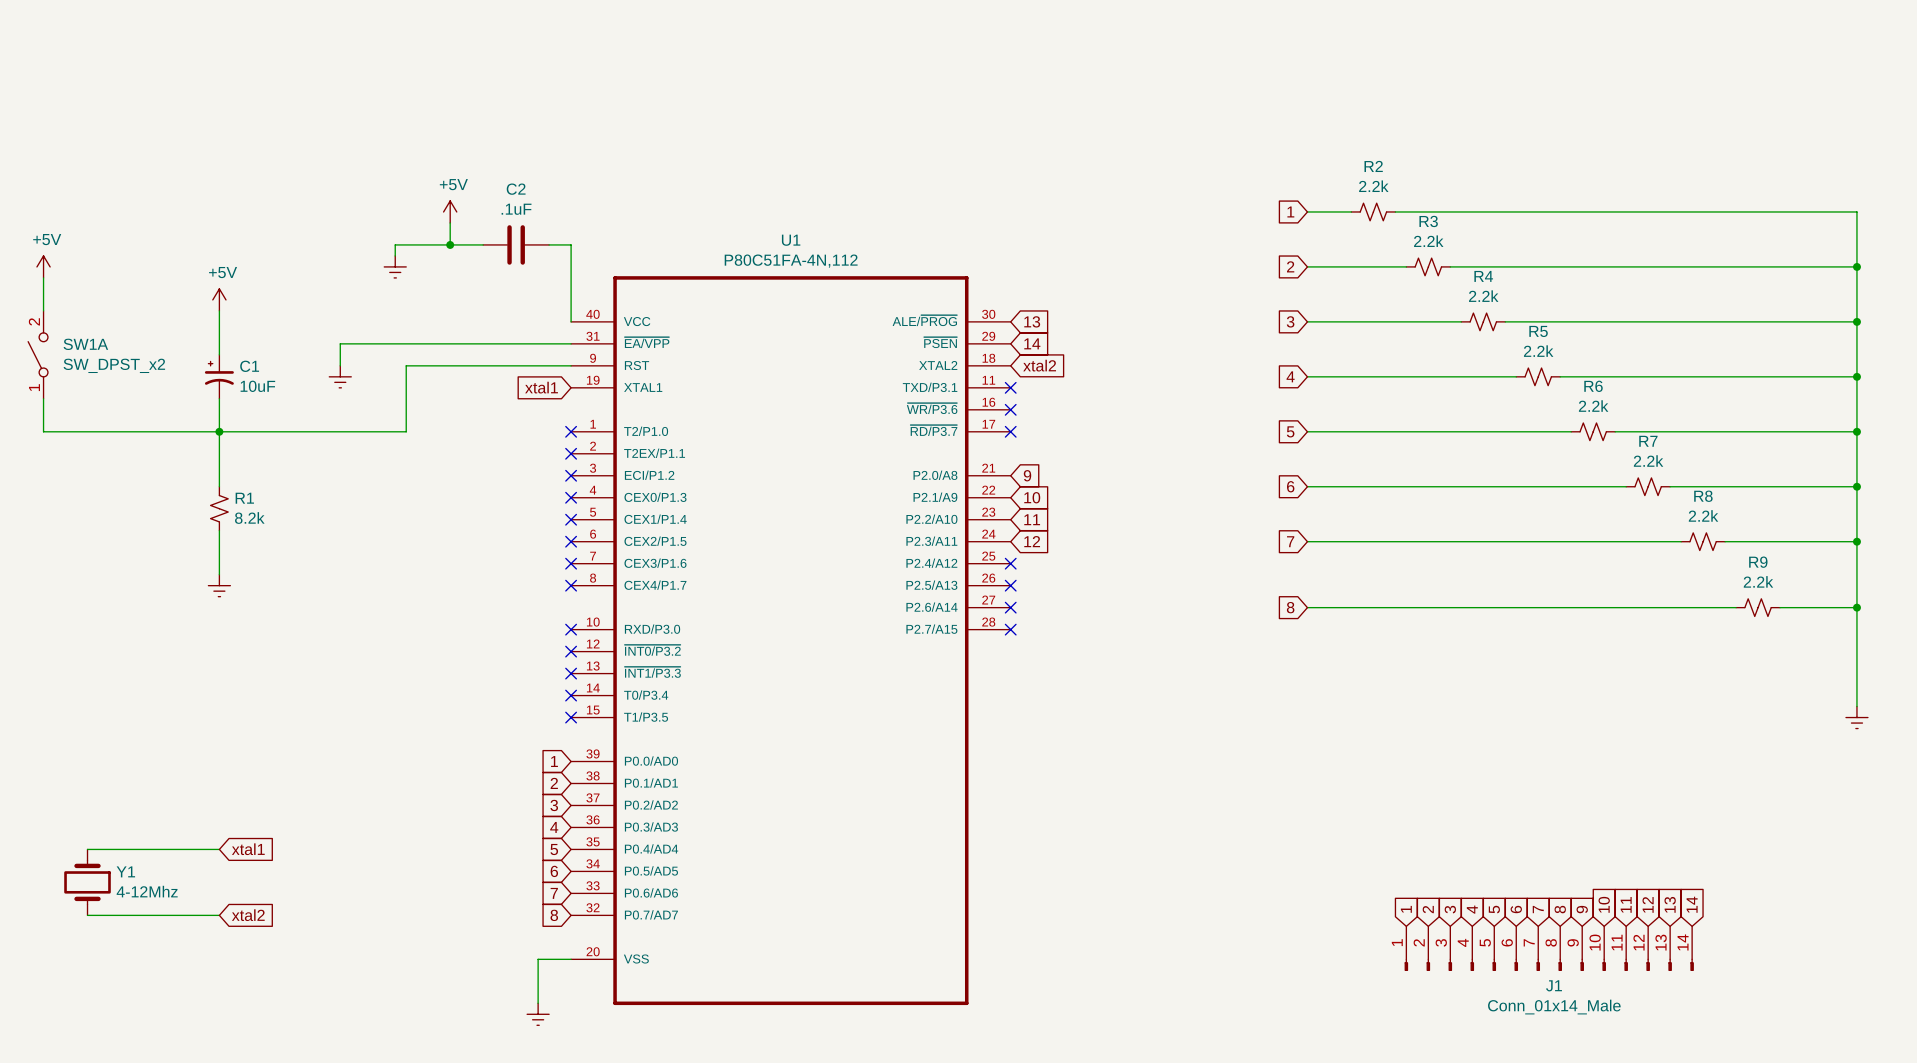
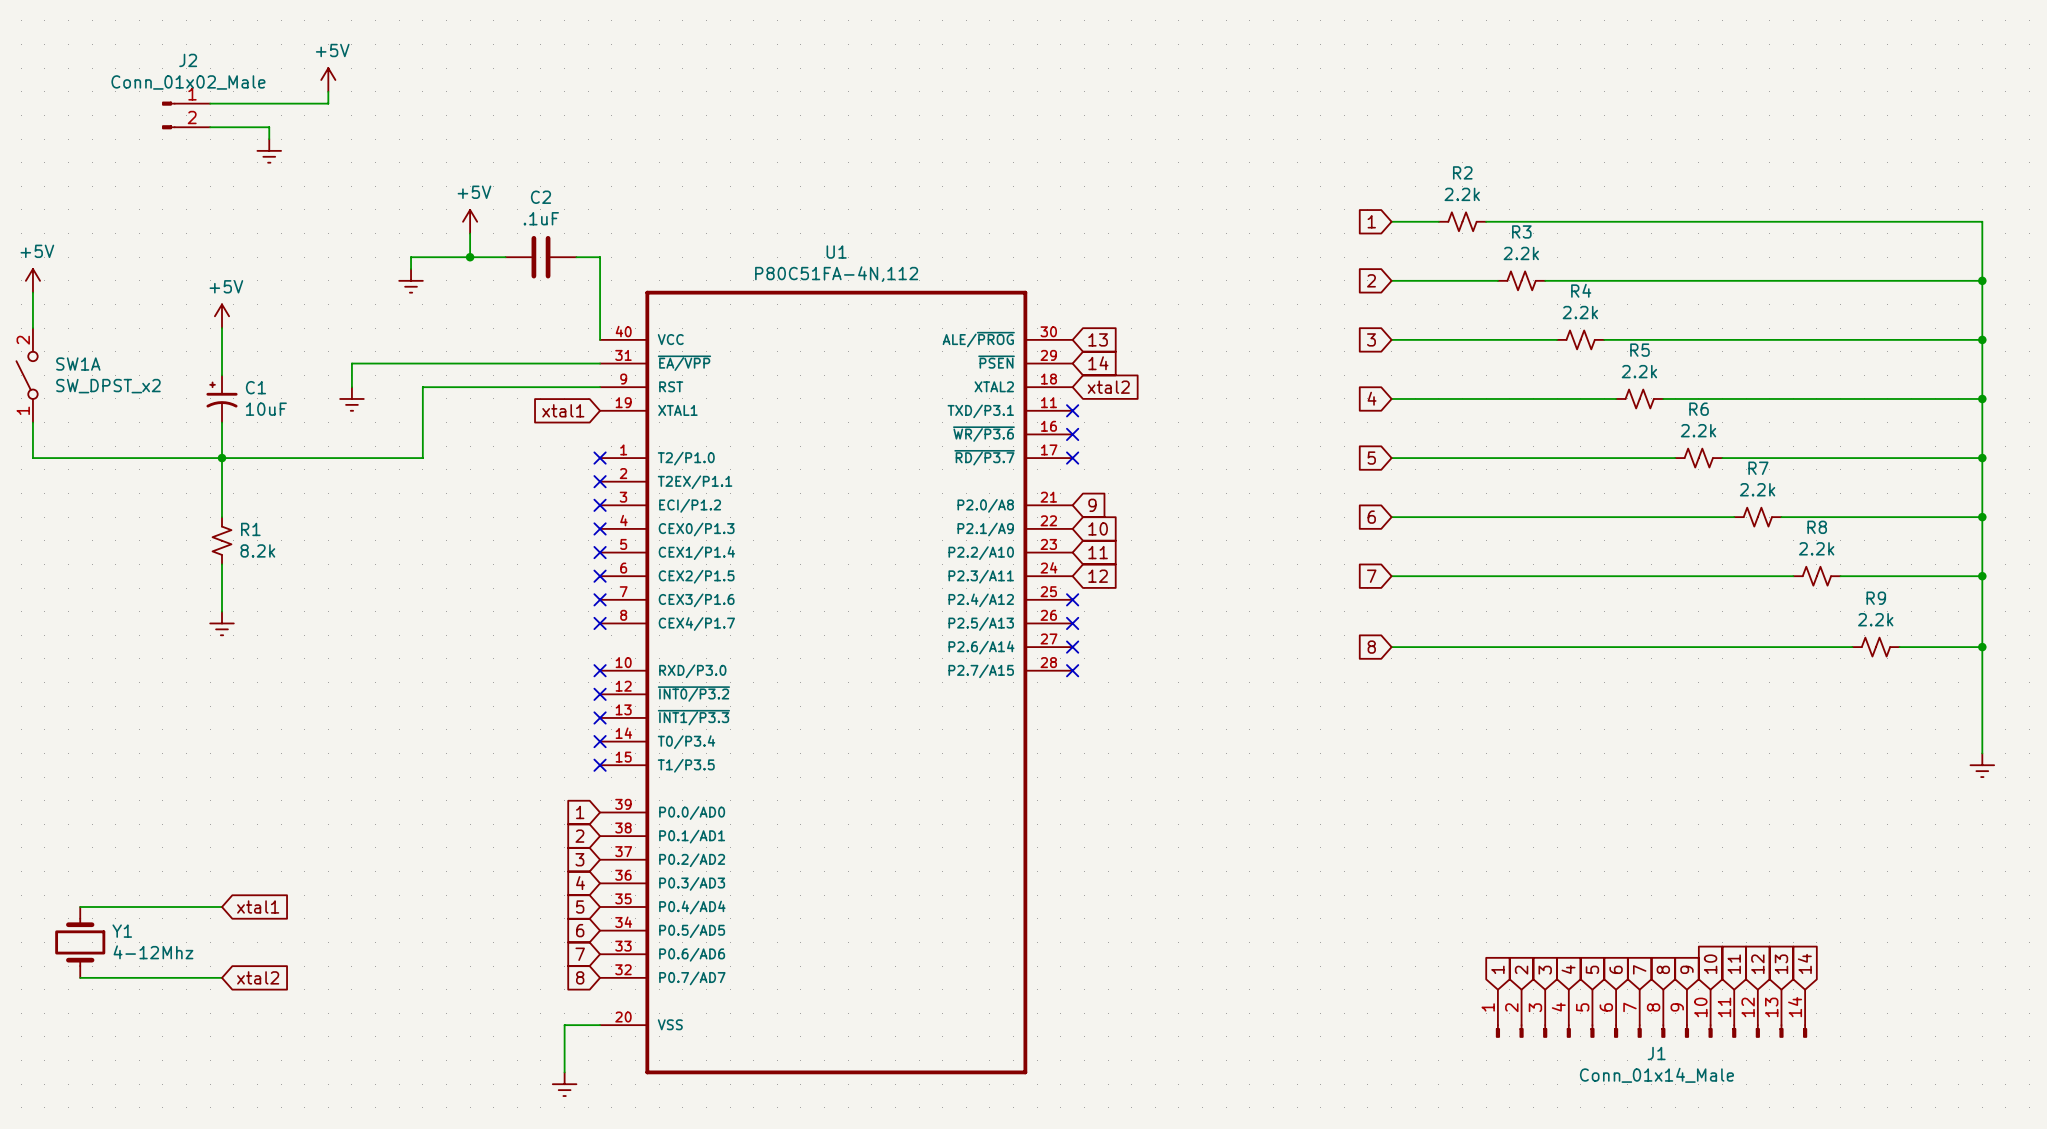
power symbol: none -> +5V (328, 80)
wire: none -> (328, 91) (328, 103) (210, 103)
J2: none -> Conn_01x02_Male (186, 115)
wire: none -> (210, 127) (269, 127) (269, 139)
power symbol: none -> (269, 150)

